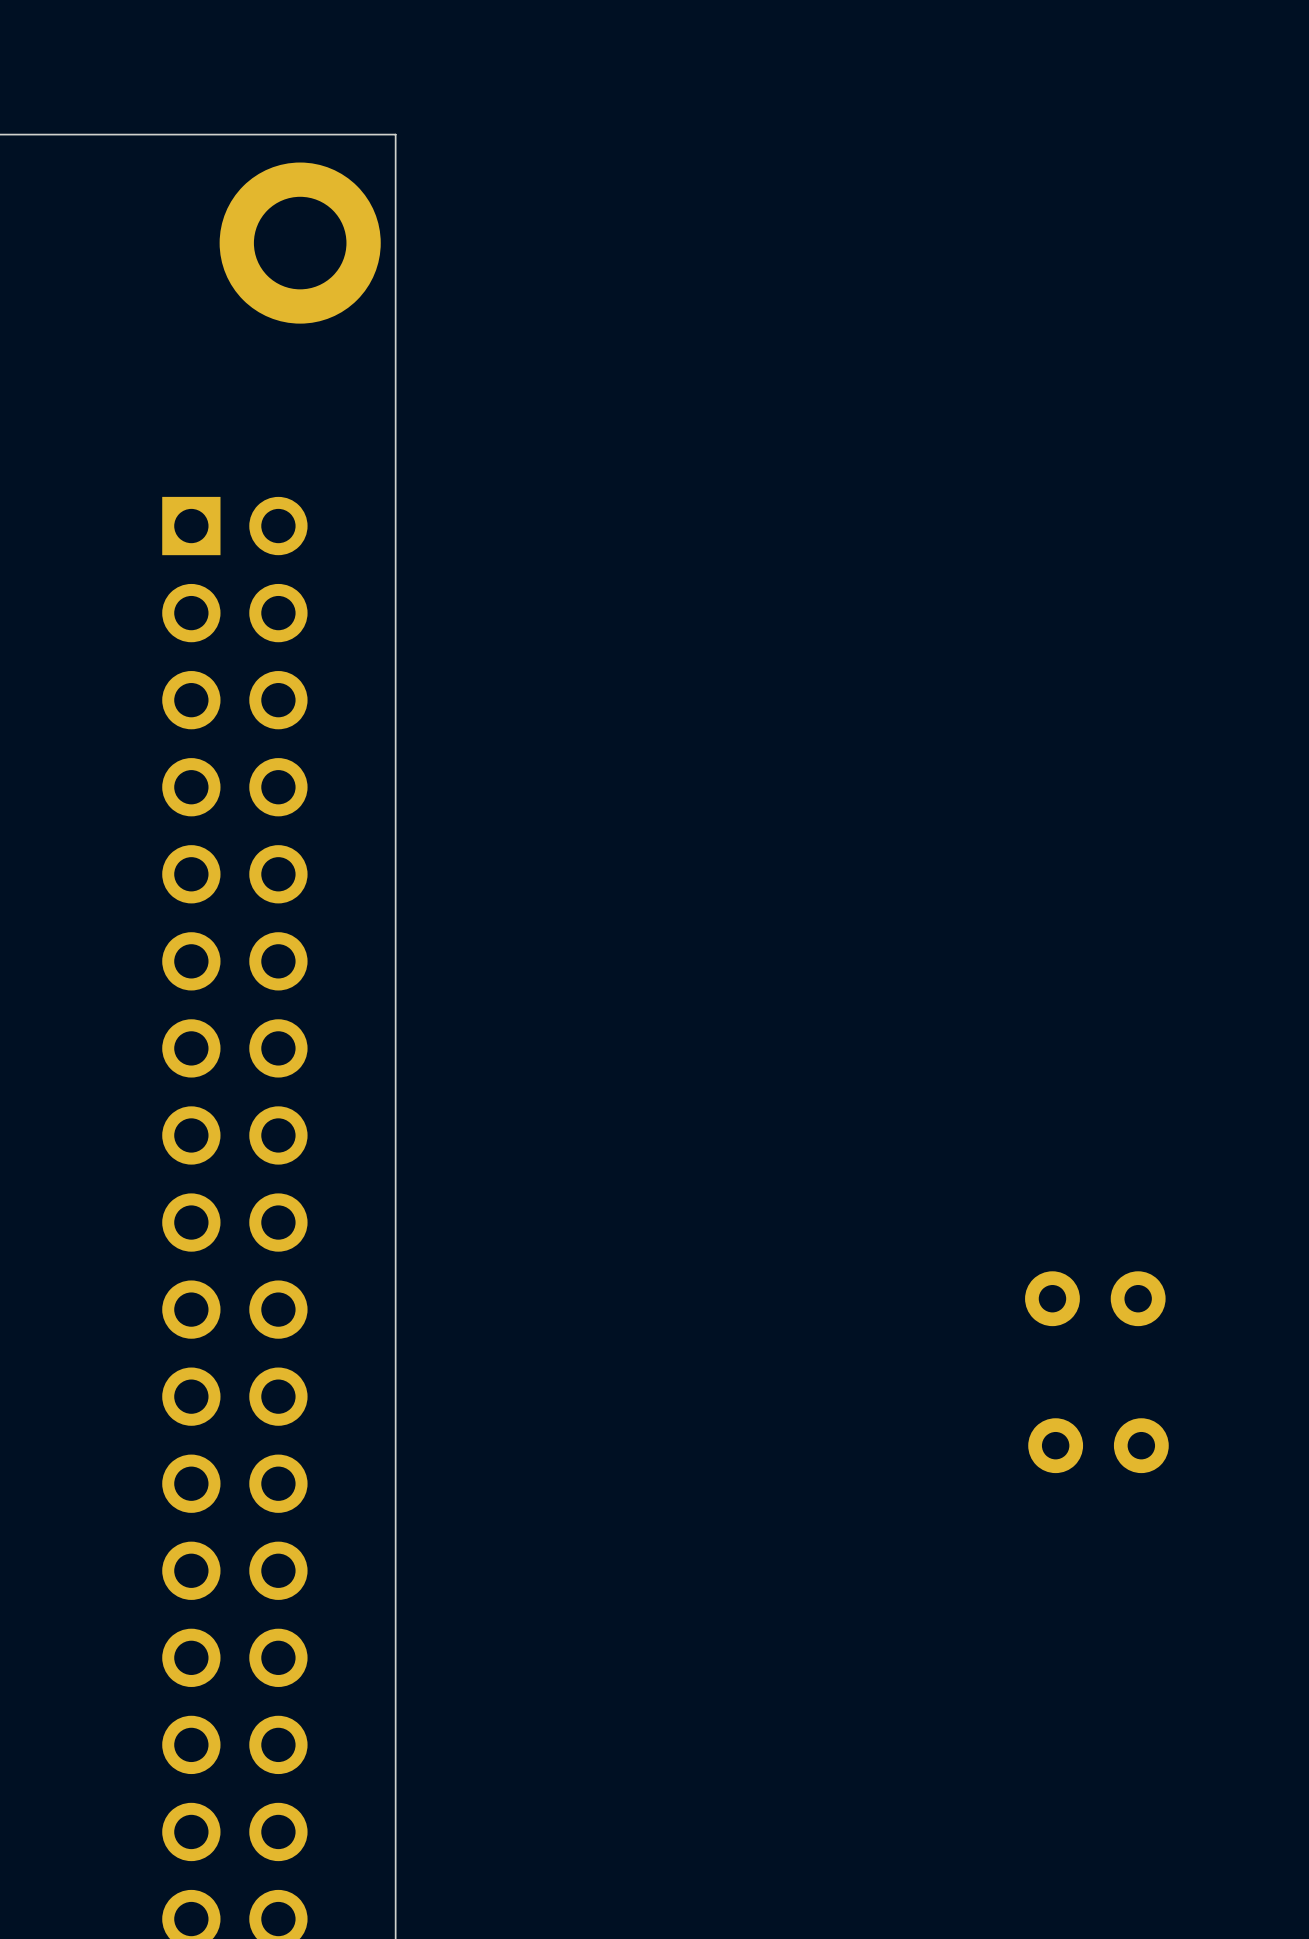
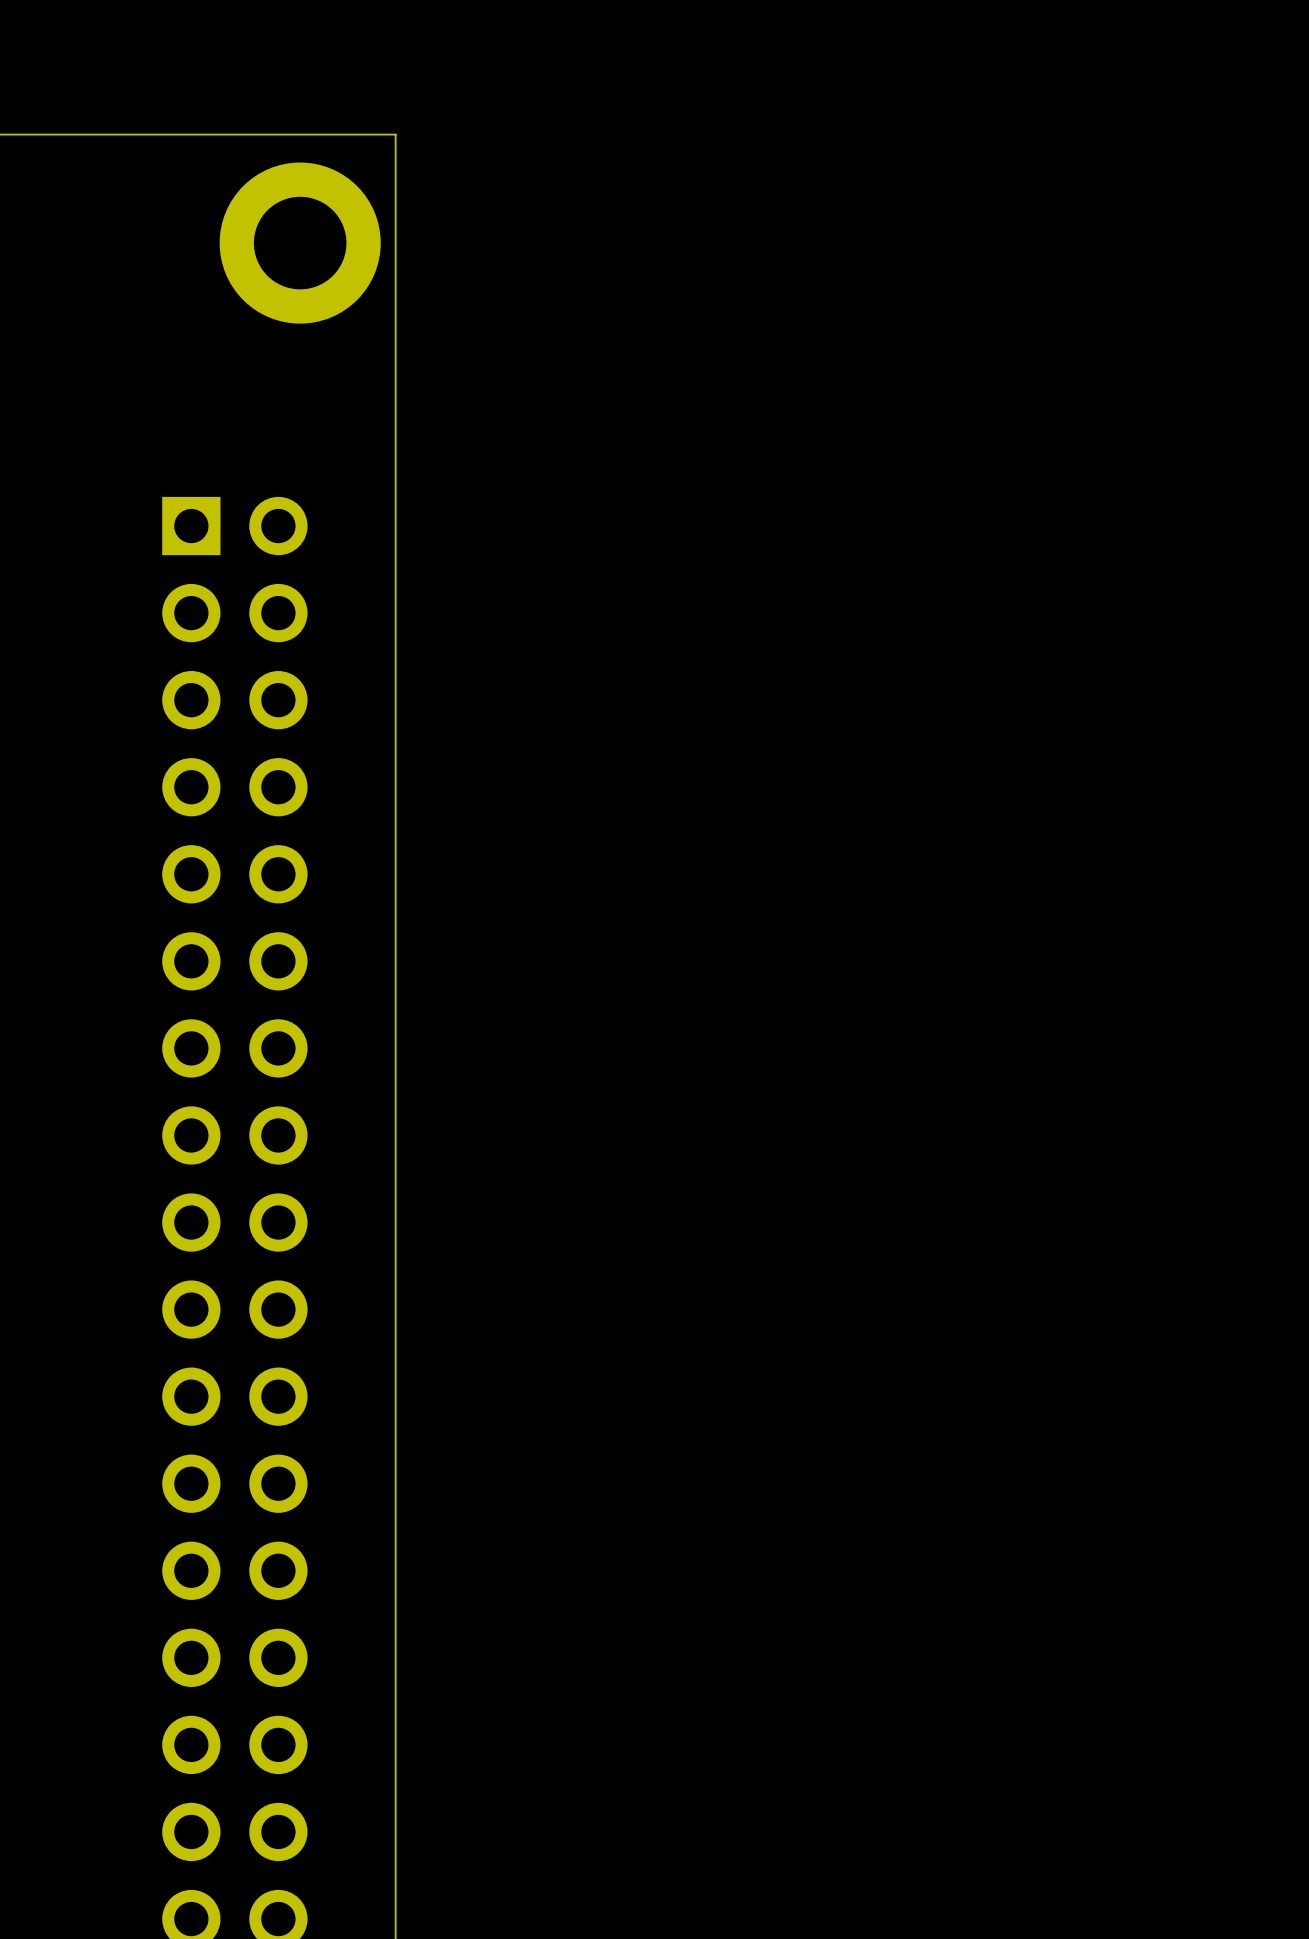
part: (1095, 1298) -> none
part: (1098, 1445) -> none

